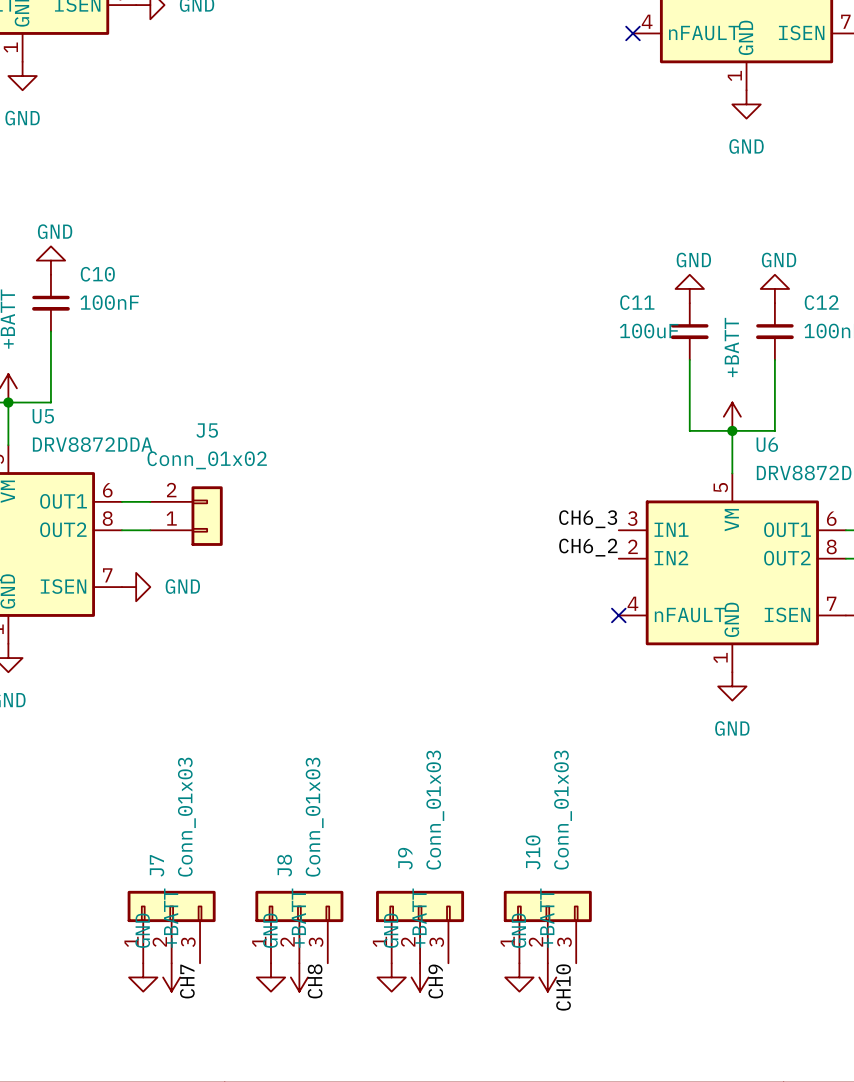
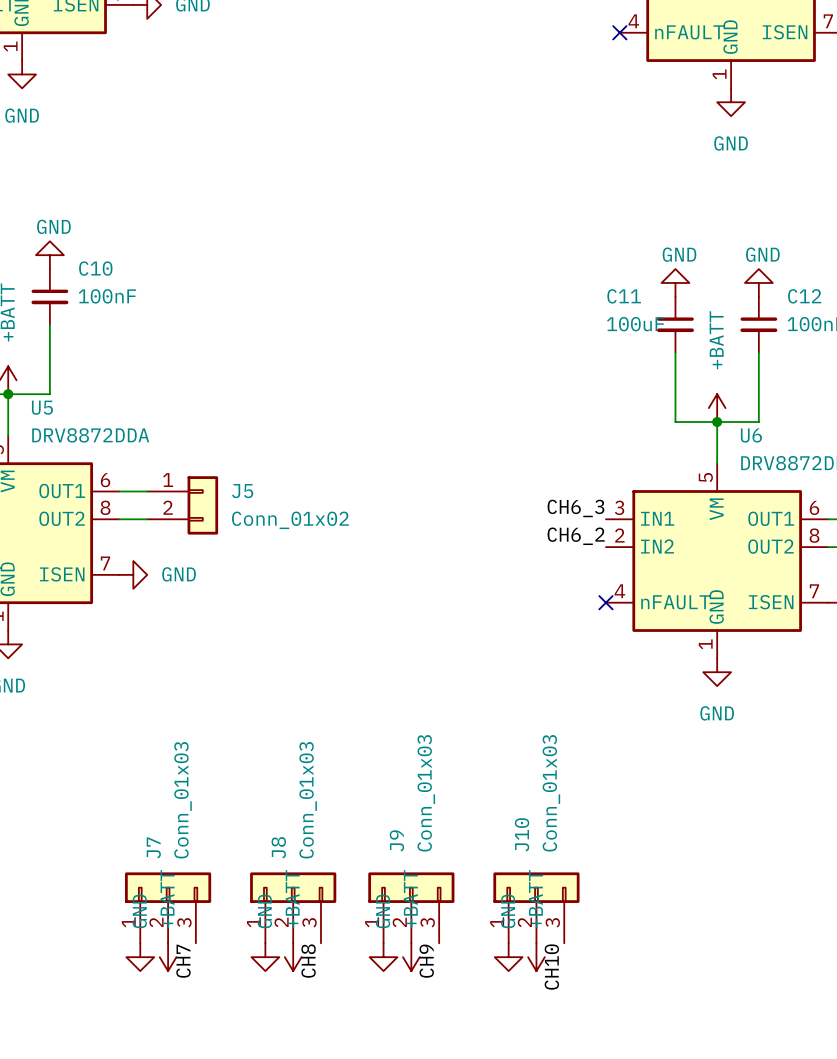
J5 name position: J5 (207, 430) -> J5 (242, 491)
J5 value position: Conn_01x02 (207, 460) -> Conn_01x02 (290, 520)
J5 flip: as is (207, 516) -> up-down (202, 505)

